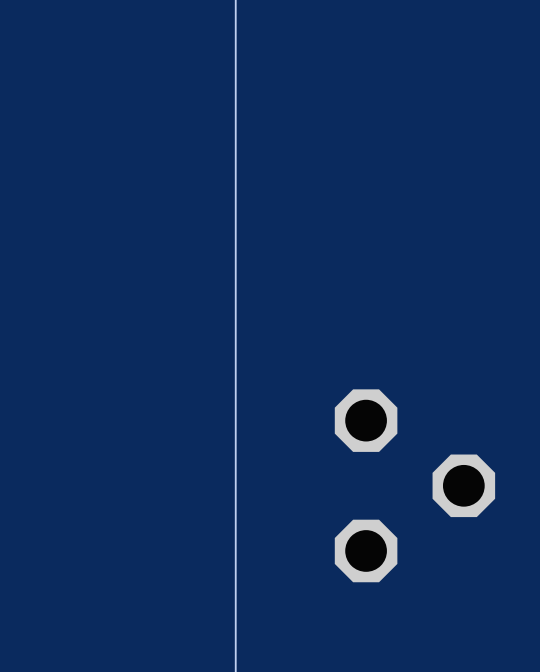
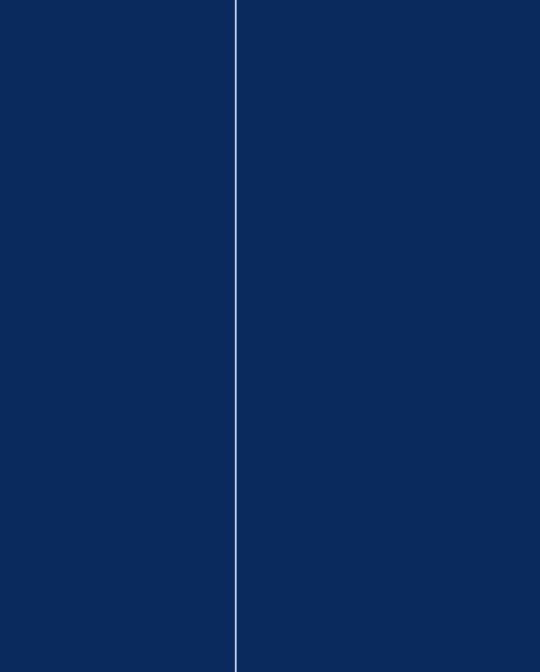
part: (414, 485) -> none

